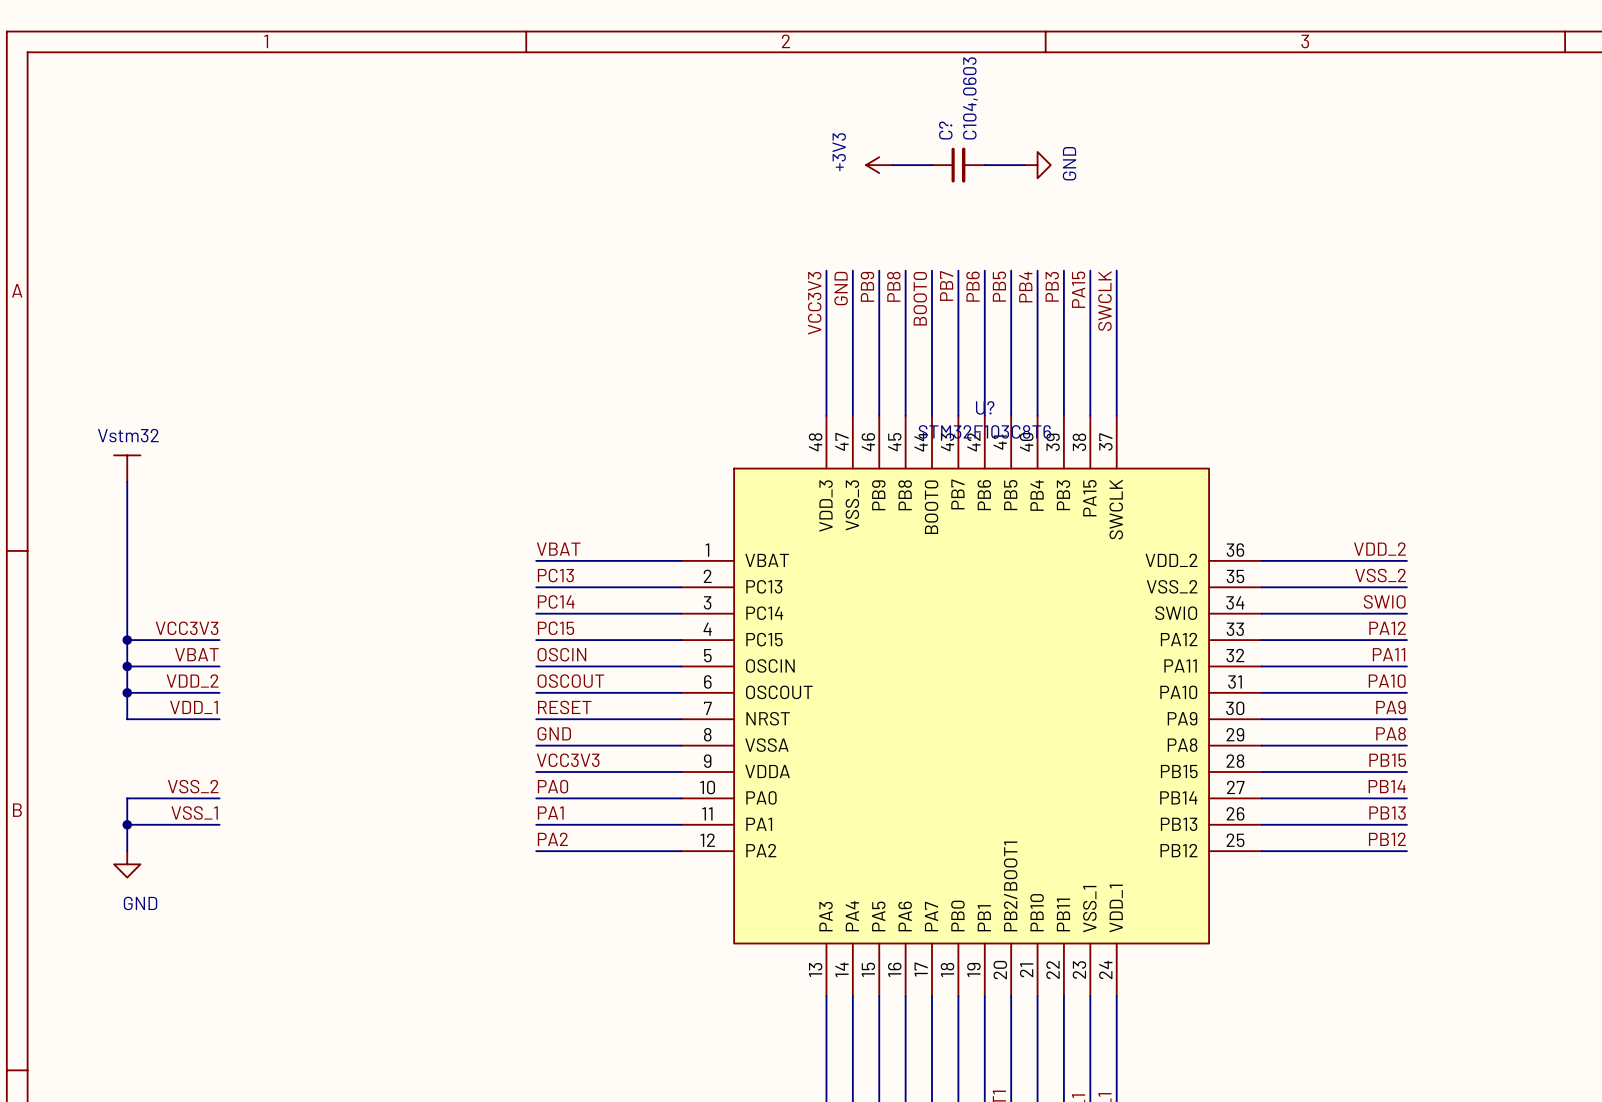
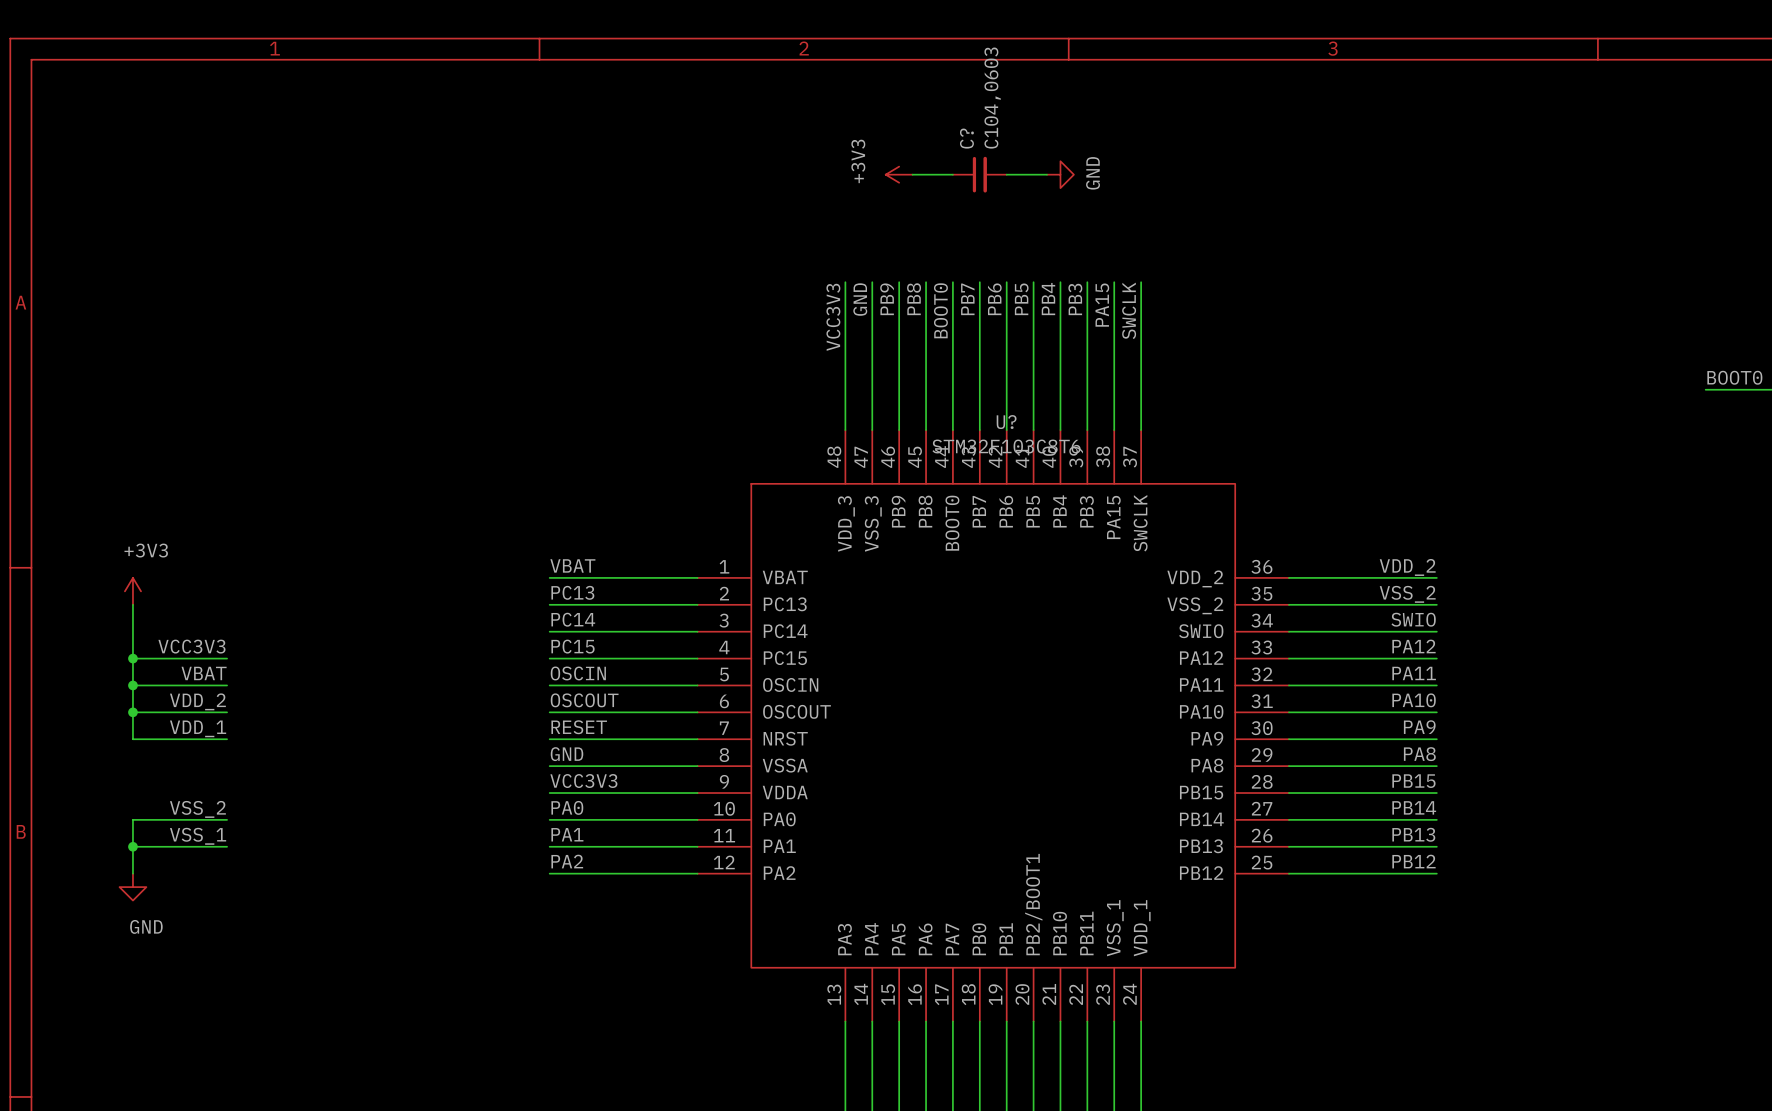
power symbol: Vstm32 (127, 468) -> none
wire: (127, 481) (127, 587) -> none
power symbol: none -> +3V3 (132, 591)

